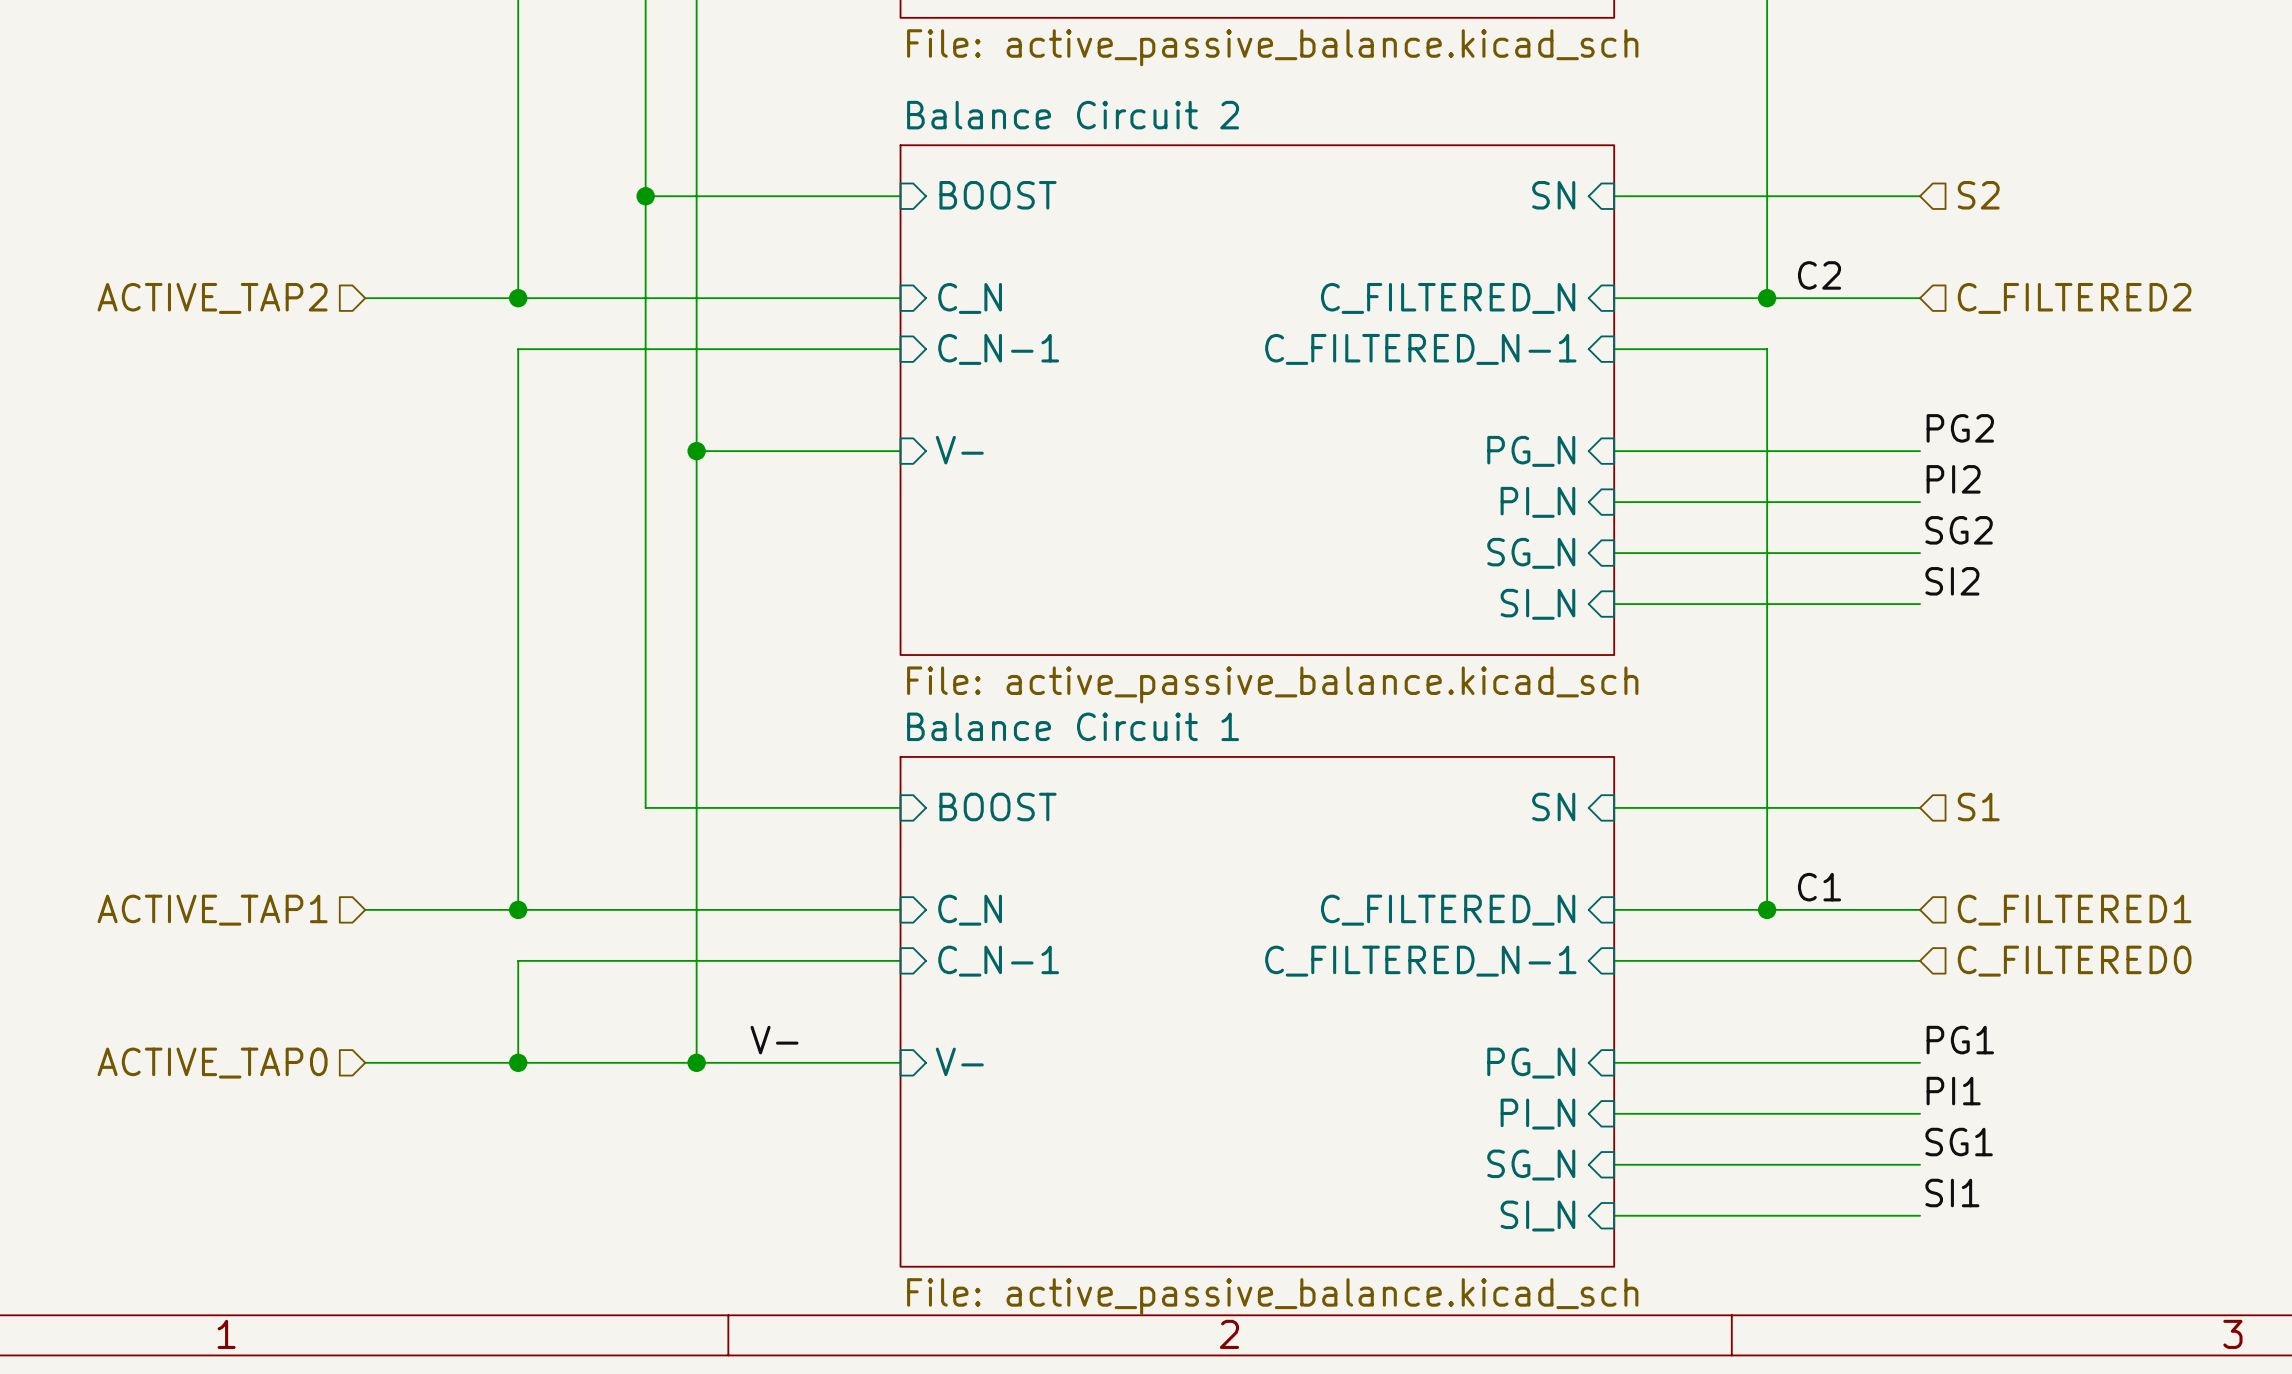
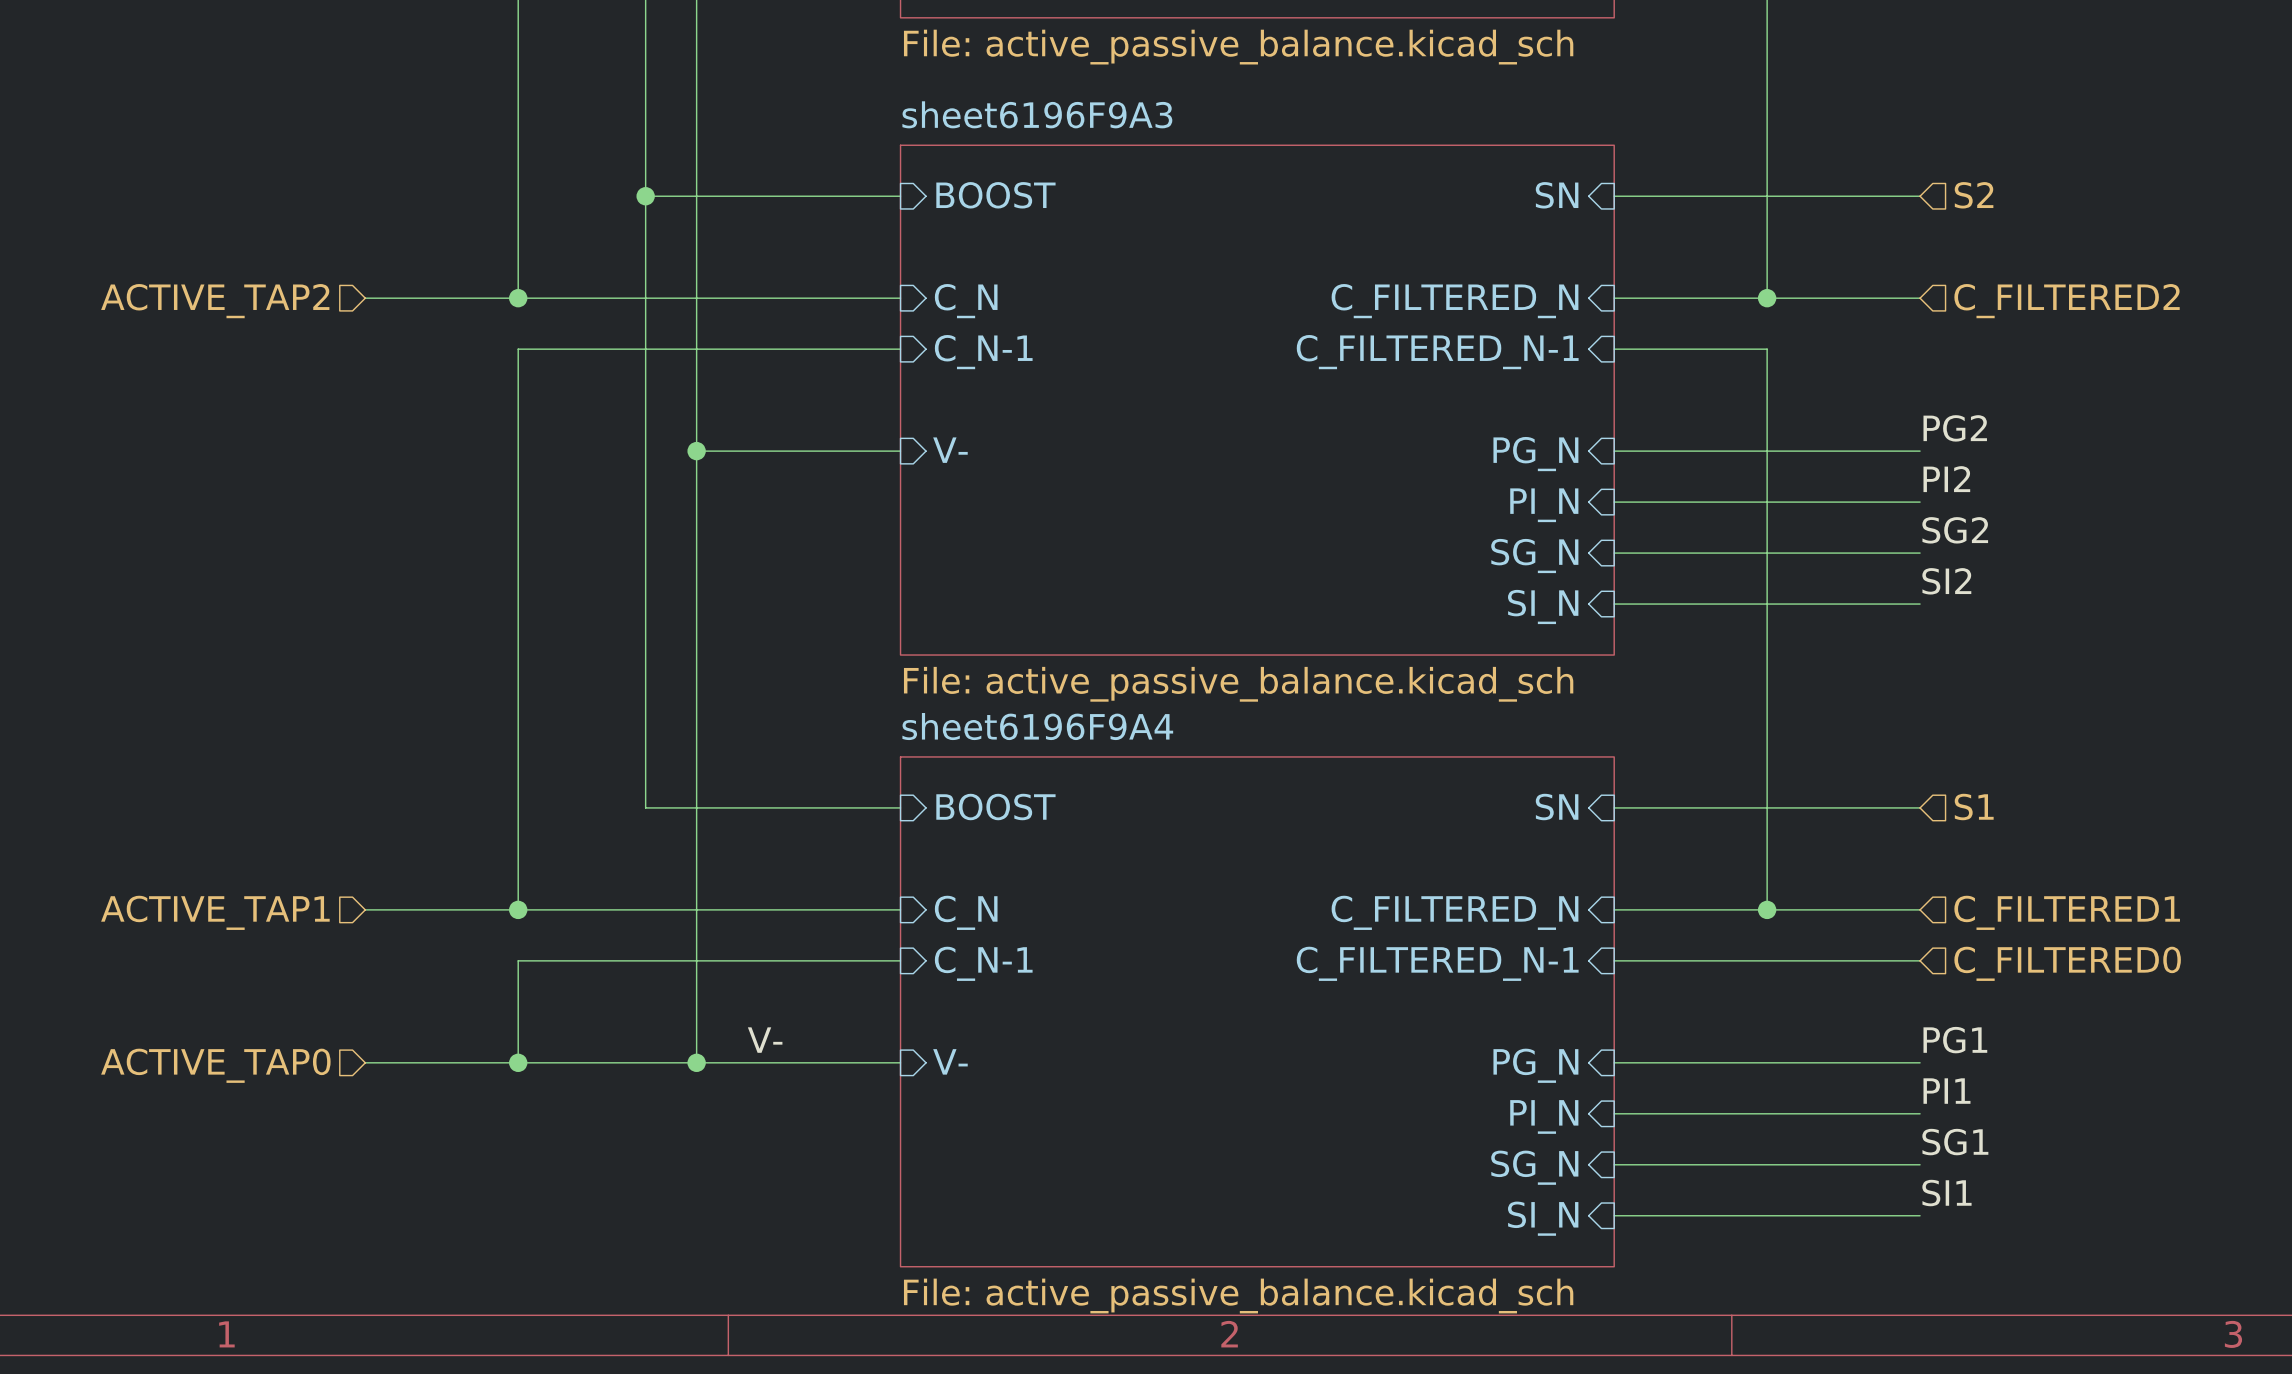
sheet Balance Circuit 2 name: Balance Circuit 2 (1073, 115) -> sheet6196F9A3 (1037, 114)
label: C2 (1819, 275) -> none
sheet Balance Circuit 1 name: Balance Circuit 1 (1073, 726) -> sheet6196F9A4 (1037, 726)
label: C1 (1819, 887) -> none

